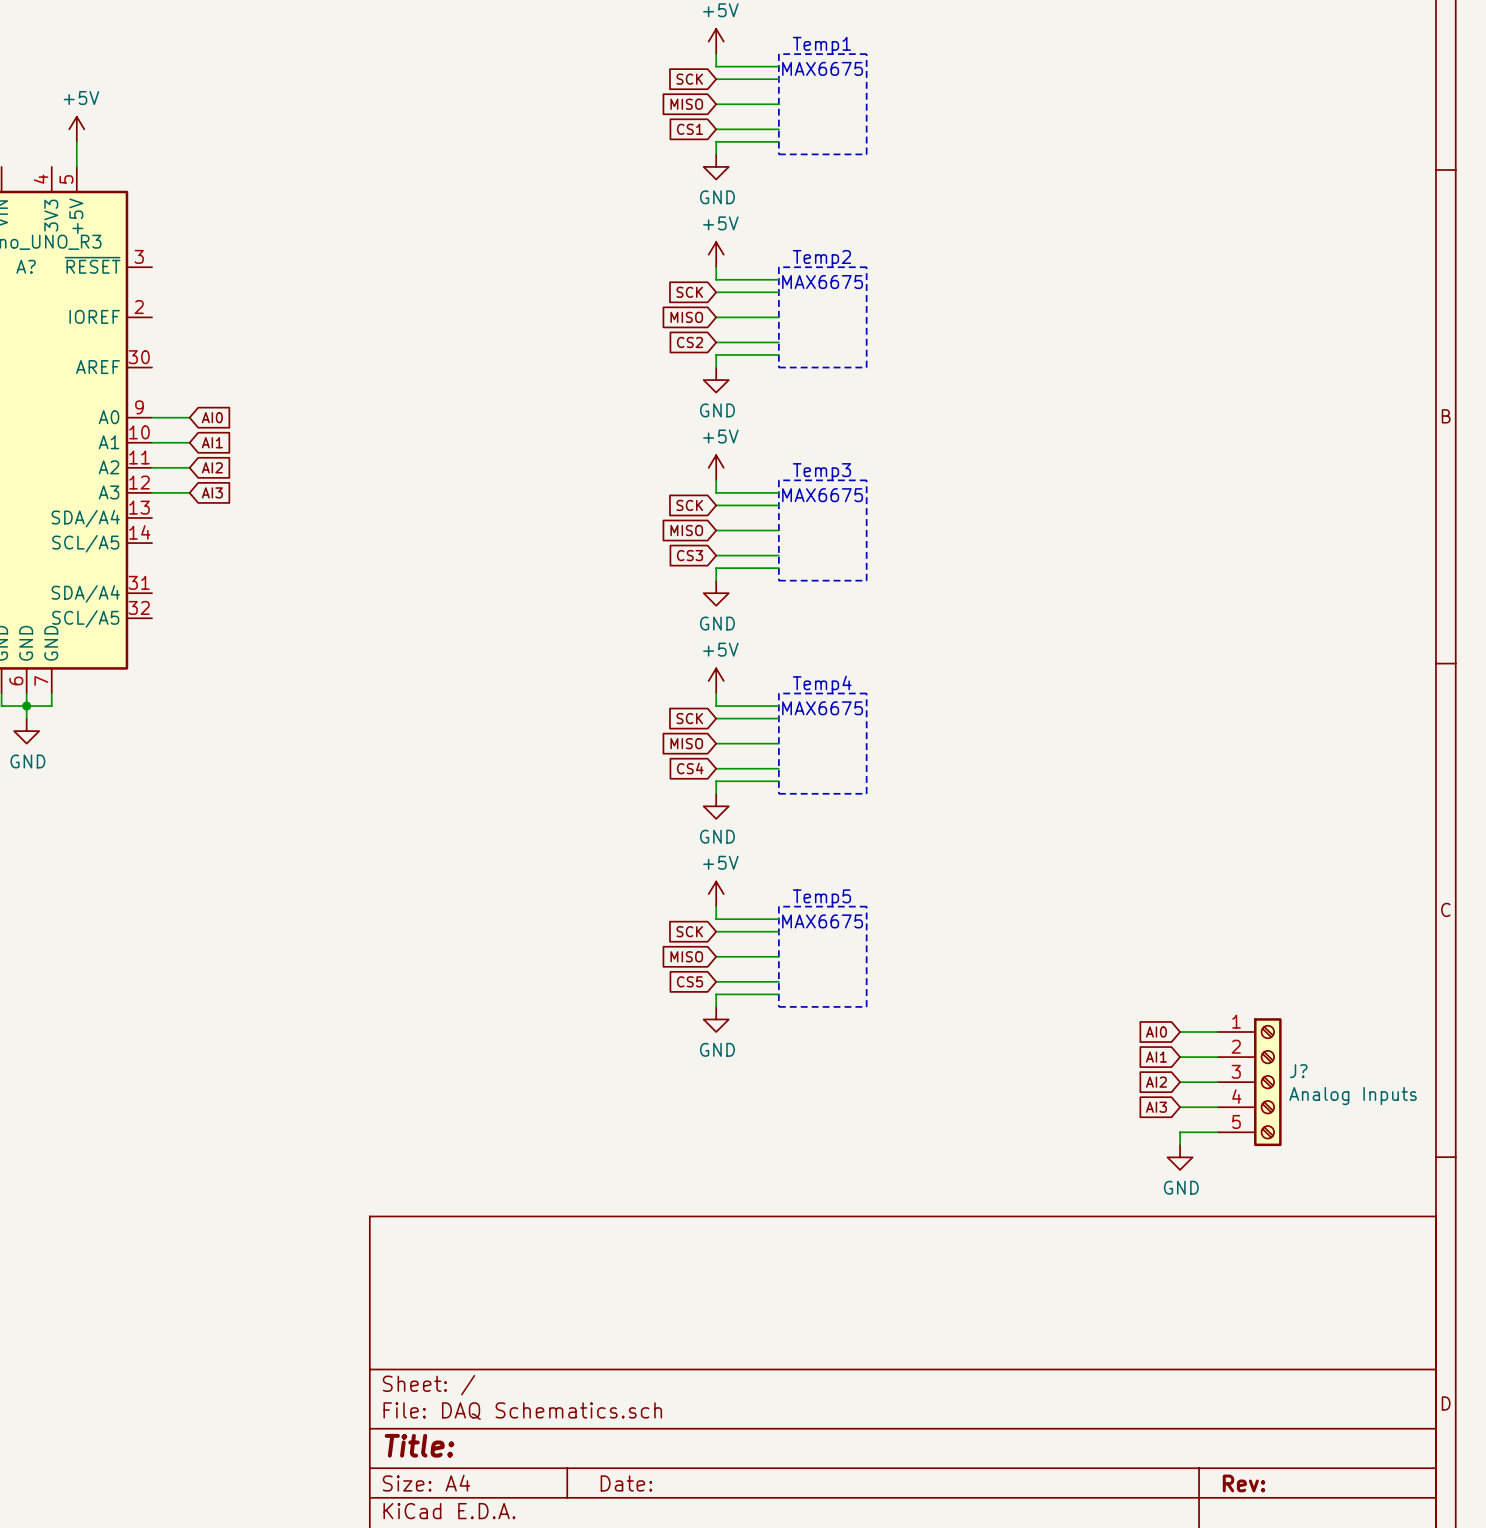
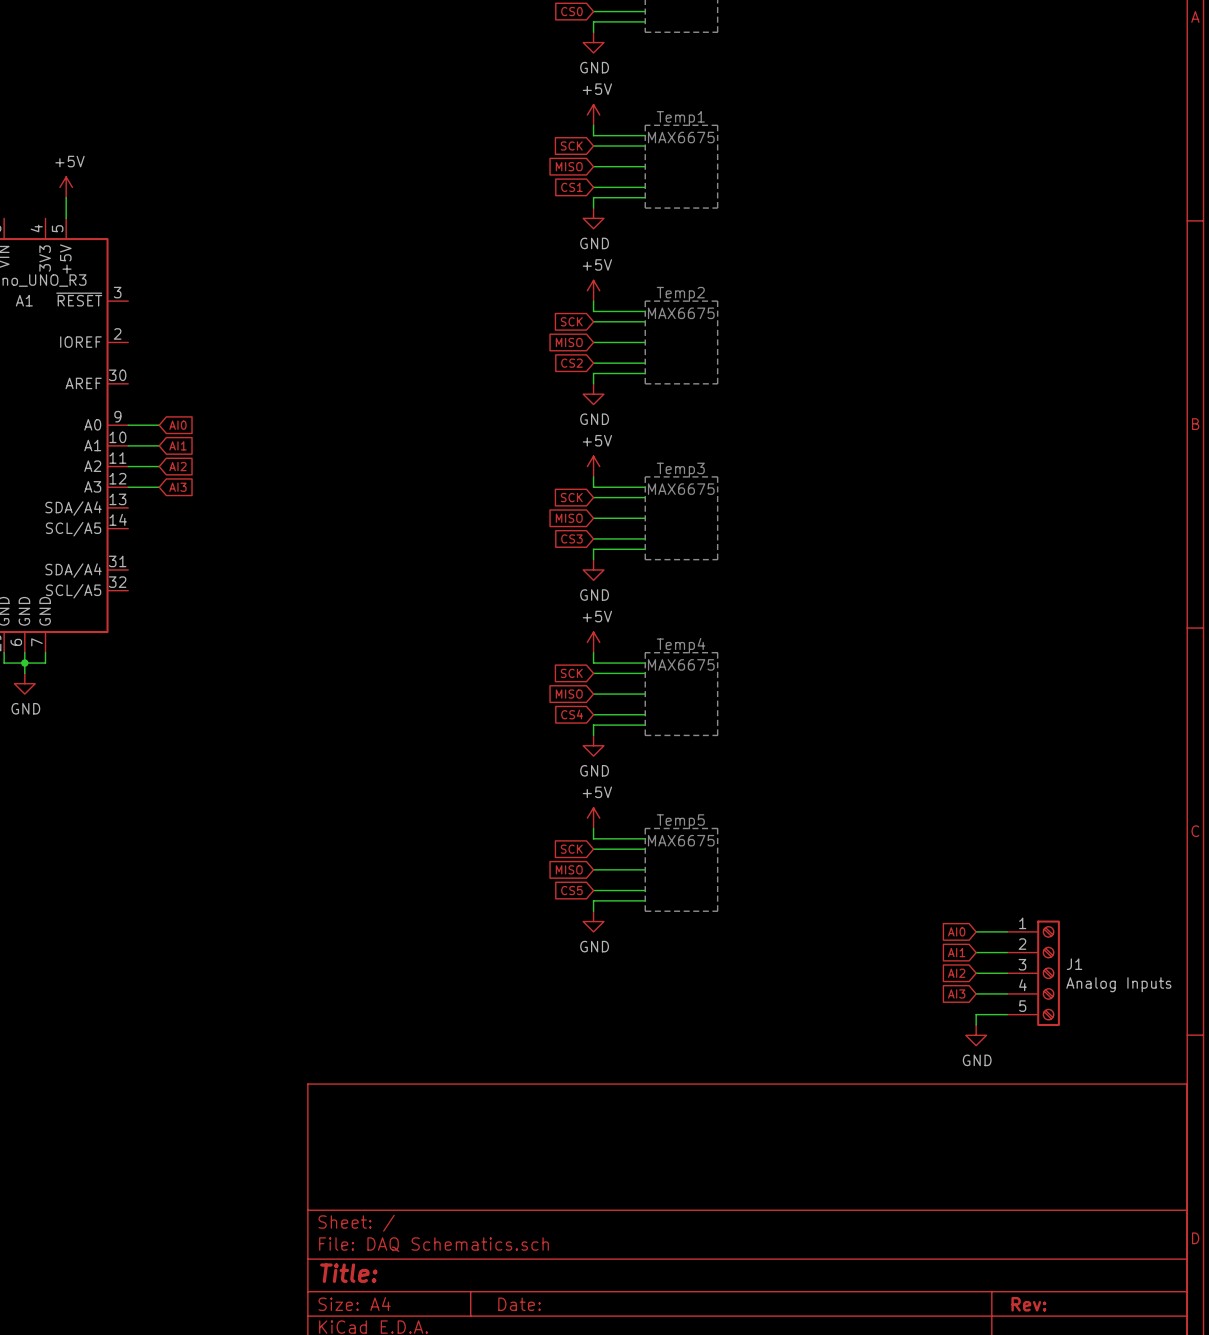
A? name: A? (26, 266) -> A1 (24, 300)
J? name: J? (1298, 1071) -> J1 (1074, 964)

